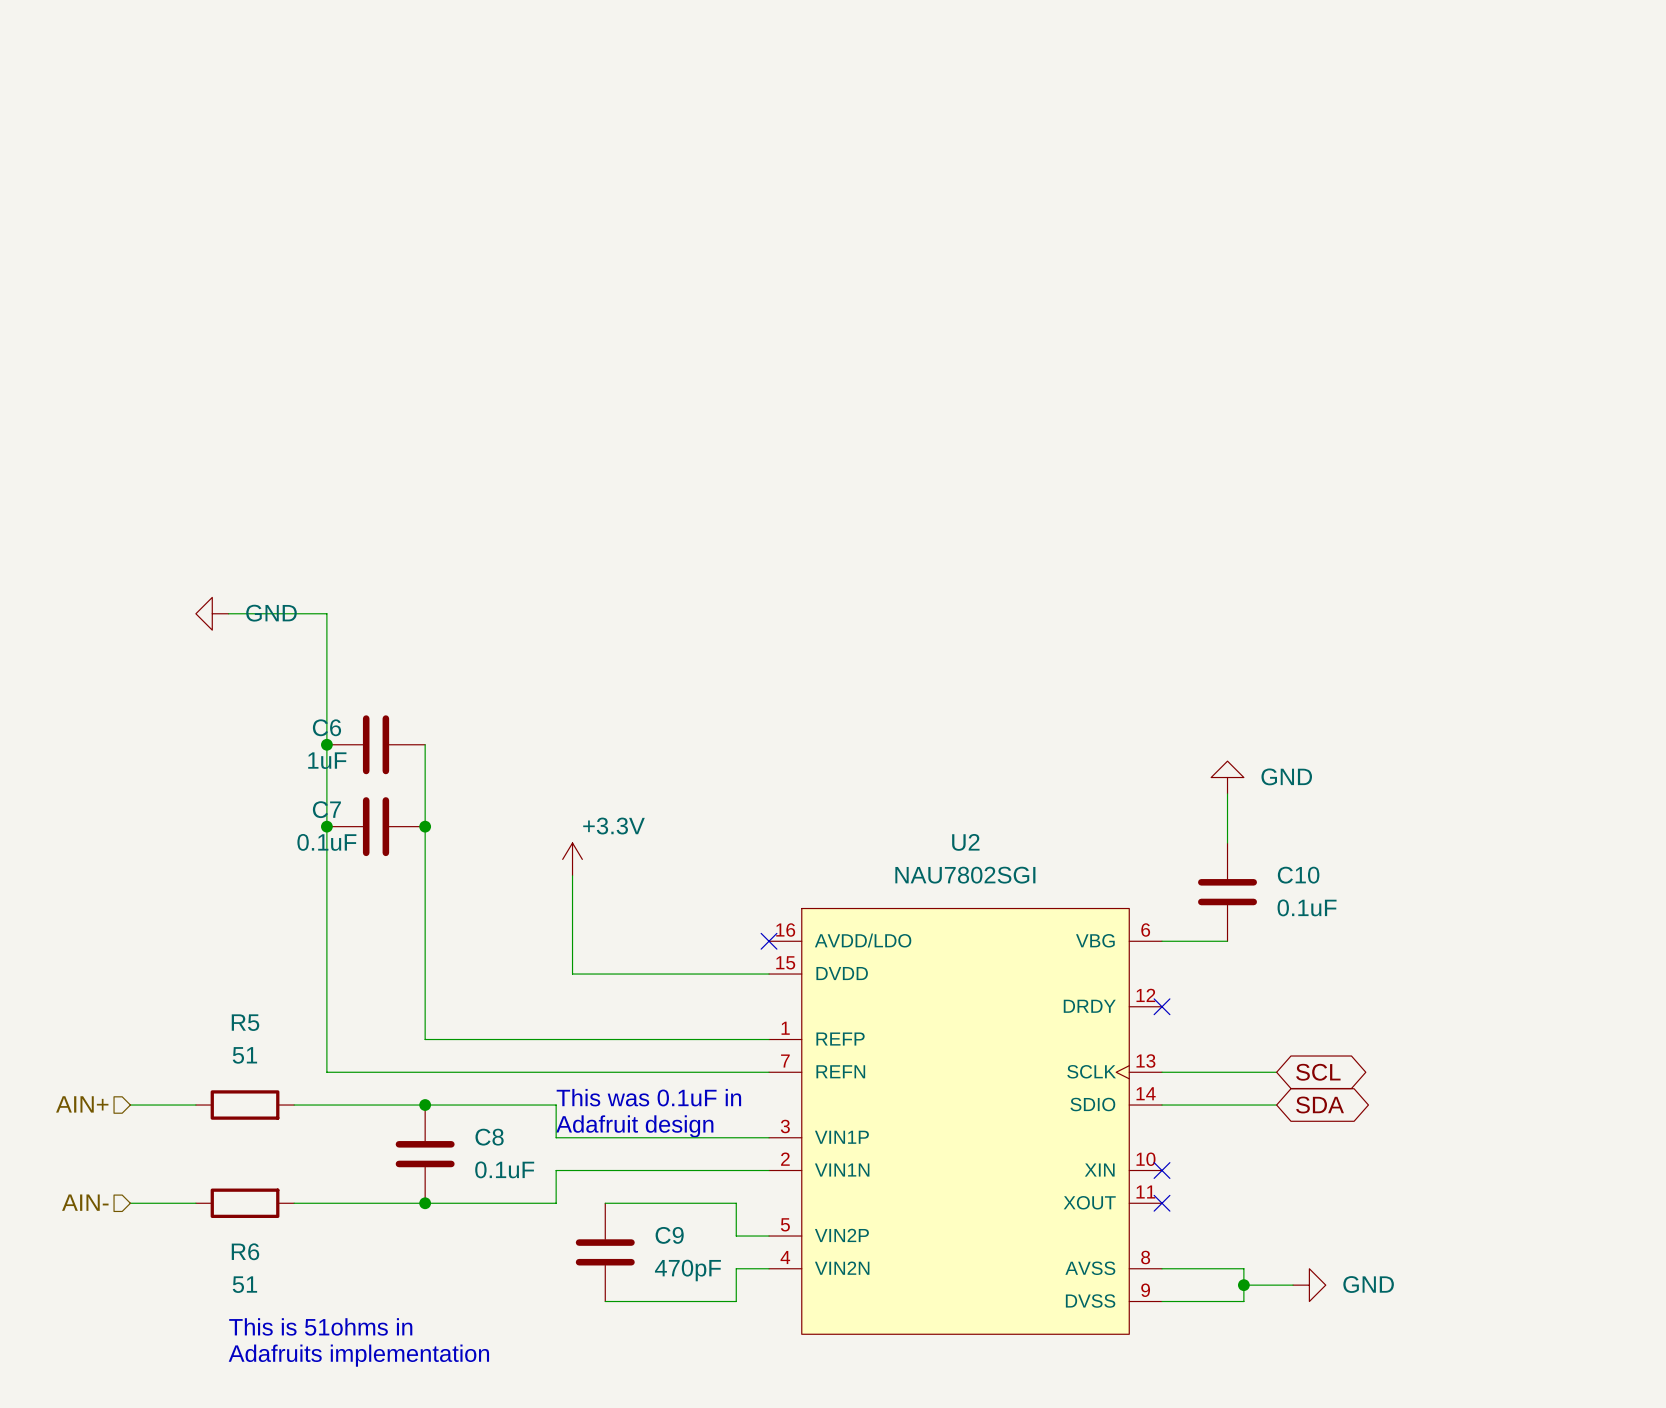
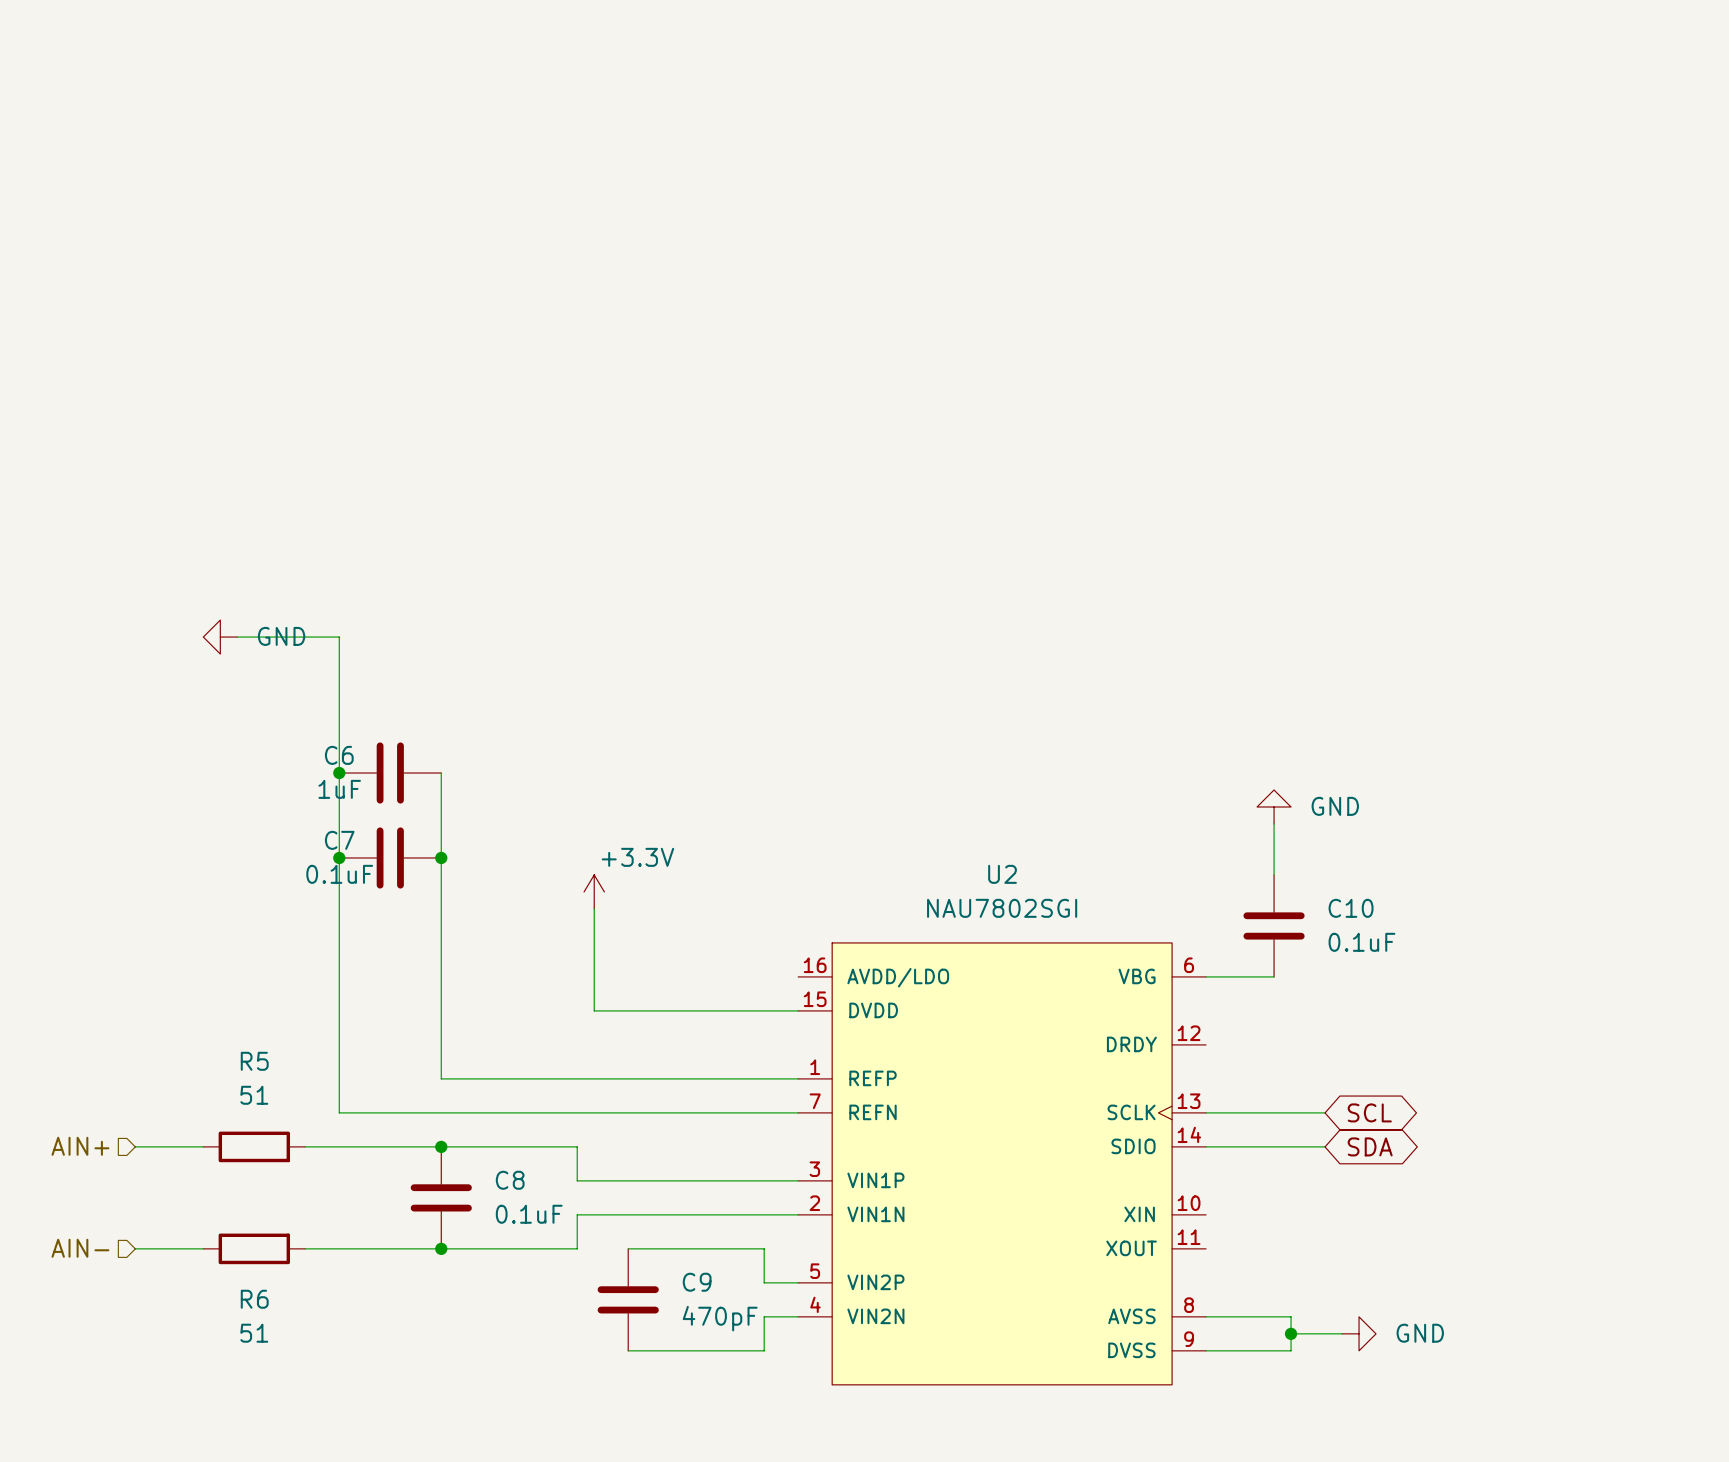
no-connect mark: (769, 941) -> none
no-connect mark: (1162, 1006) -> none
text: This was 0.1uF in (648, 1097) -> none
text: Adafruit design (634, 1126) -> none
no-connect mark: (1162, 1170) -> none
no-connect mark: (1162, 1203) -> none
text: This is 51ohms in (320, 1326) -> none
text: Adafruits implementation (358, 1355) -> none

